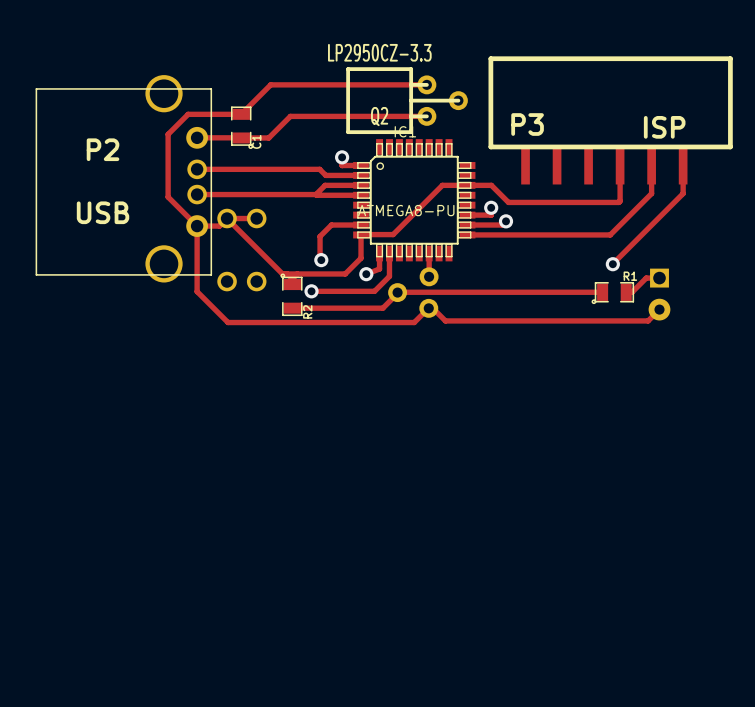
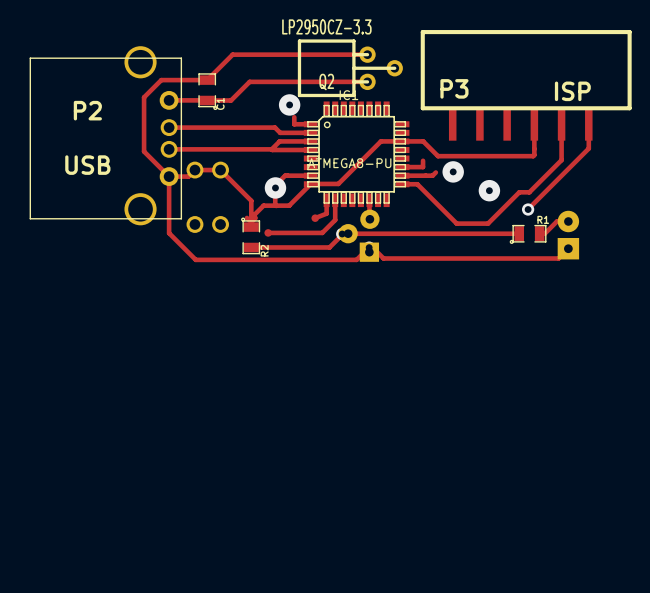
via: none -> (289, 104)
via: (342, 157) -> none
track: (651, 193) (610, 234) (484, 234) -> (561, 148) (561, 160) (529, 192) (519, 192) (488, 223) (456, 223) (417, 184)
via: (491, 207) -> none
track: (227, 218) (282, 273) (345, 273) (361, 258) (361, 234) -> (251, 217) (263, 205) (289, 205) (310, 184)
track: none -> (220, 170) (251, 200) (251, 222)
via: none -> (453, 171)
via: (506, 221) -> none
via: none -> (275, 187)
via: none -> (489, 190)
via: (321, 260) -> none
part footprint: [388, 267, 439, 318] -> [338, 209, 380, 262]
part footprint: [648, 268, 671, 321] -> [557, 210, 580, 260]
via: (366, 274) -> none
via: (311, 291) -> none

